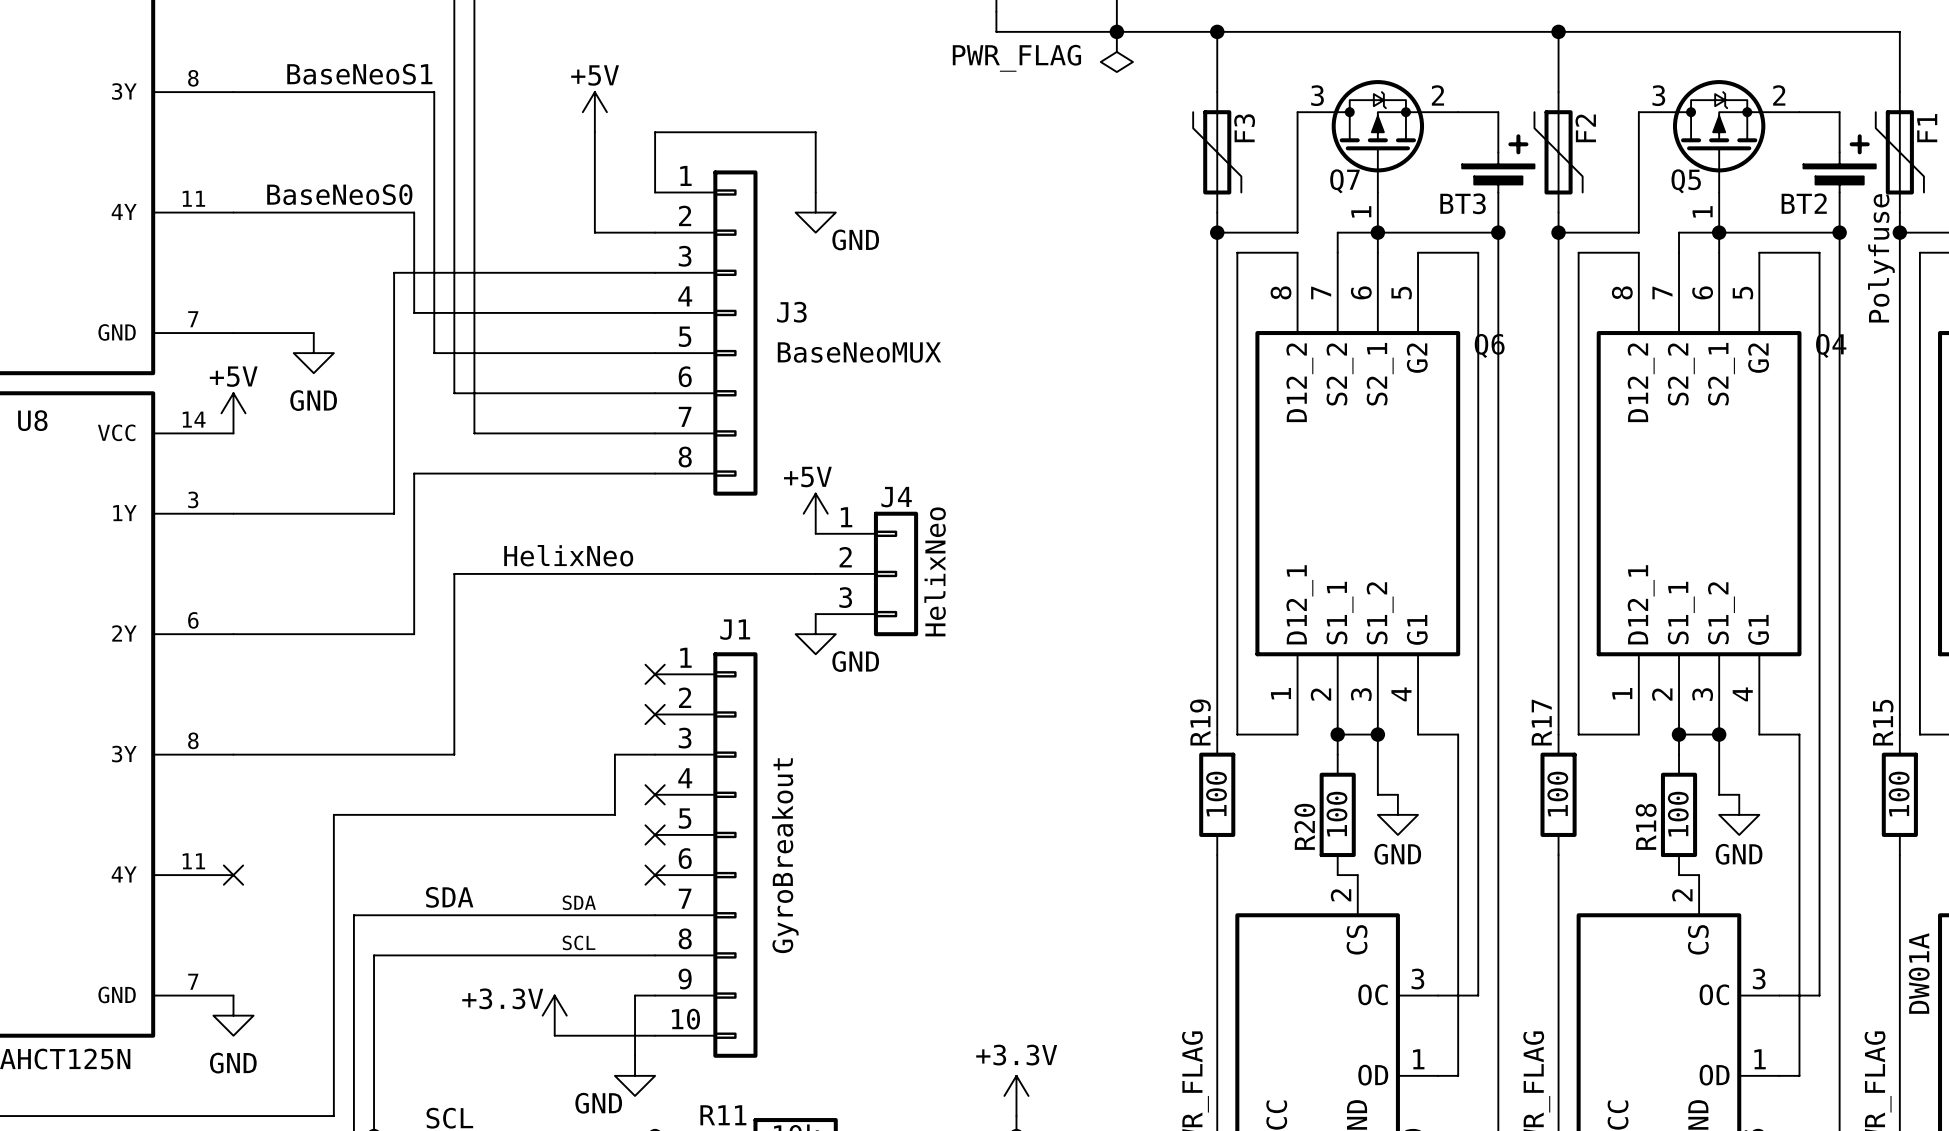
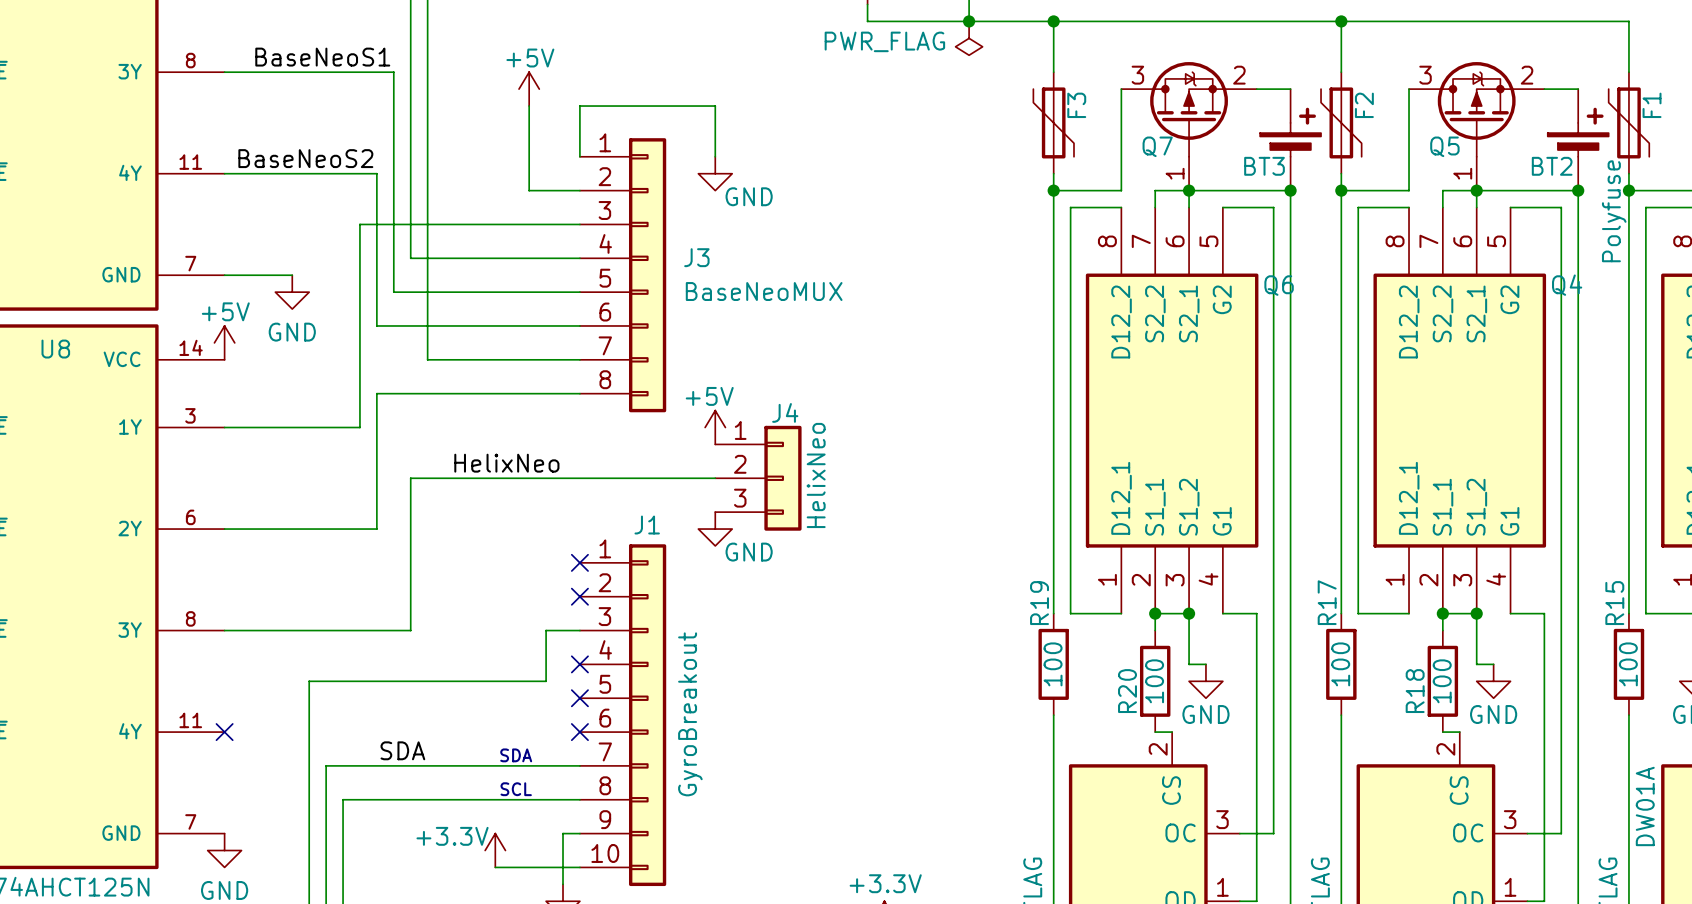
label: BaseNeoS0 (339, 194) -> BaseNeoS2 (305, 158)
wire: (414, 312) (454, 312) (454, 393) -> (376, 258) (376, 325) (410, 325)

